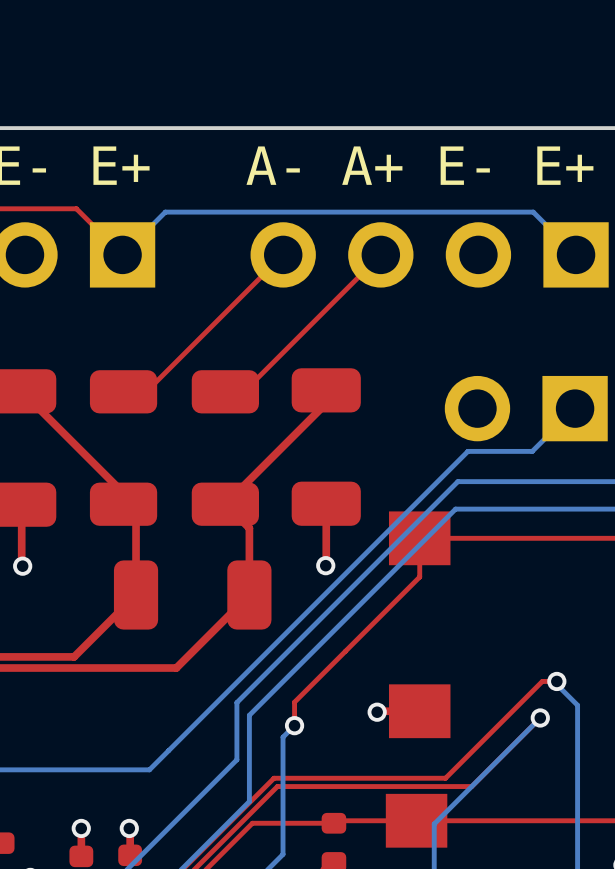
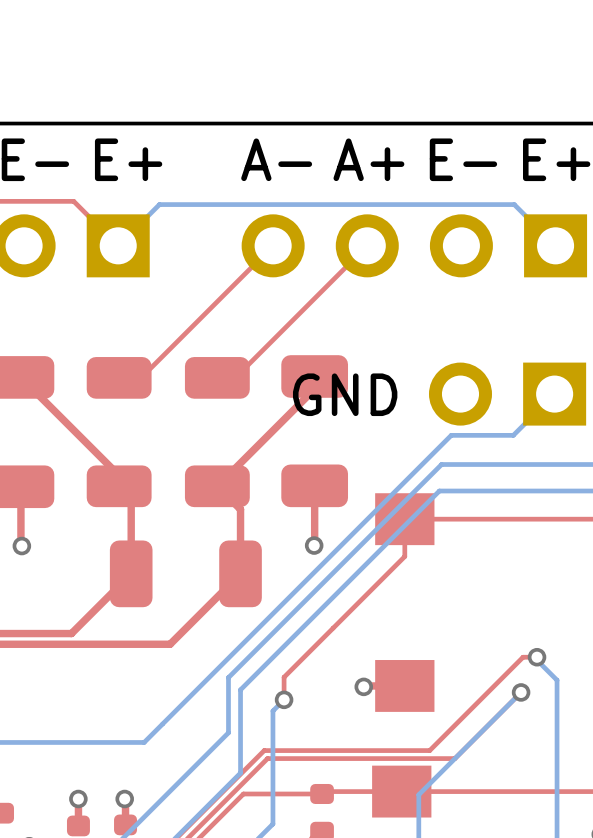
text: none -> GND (345, 394)

